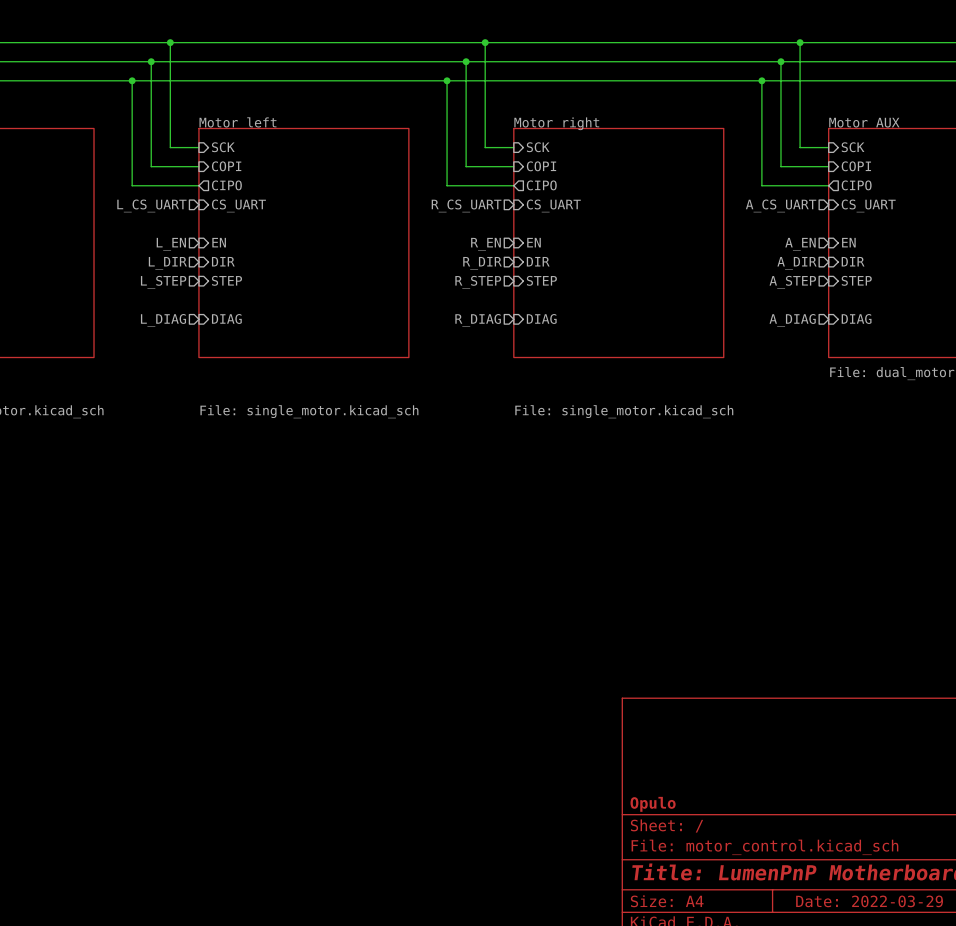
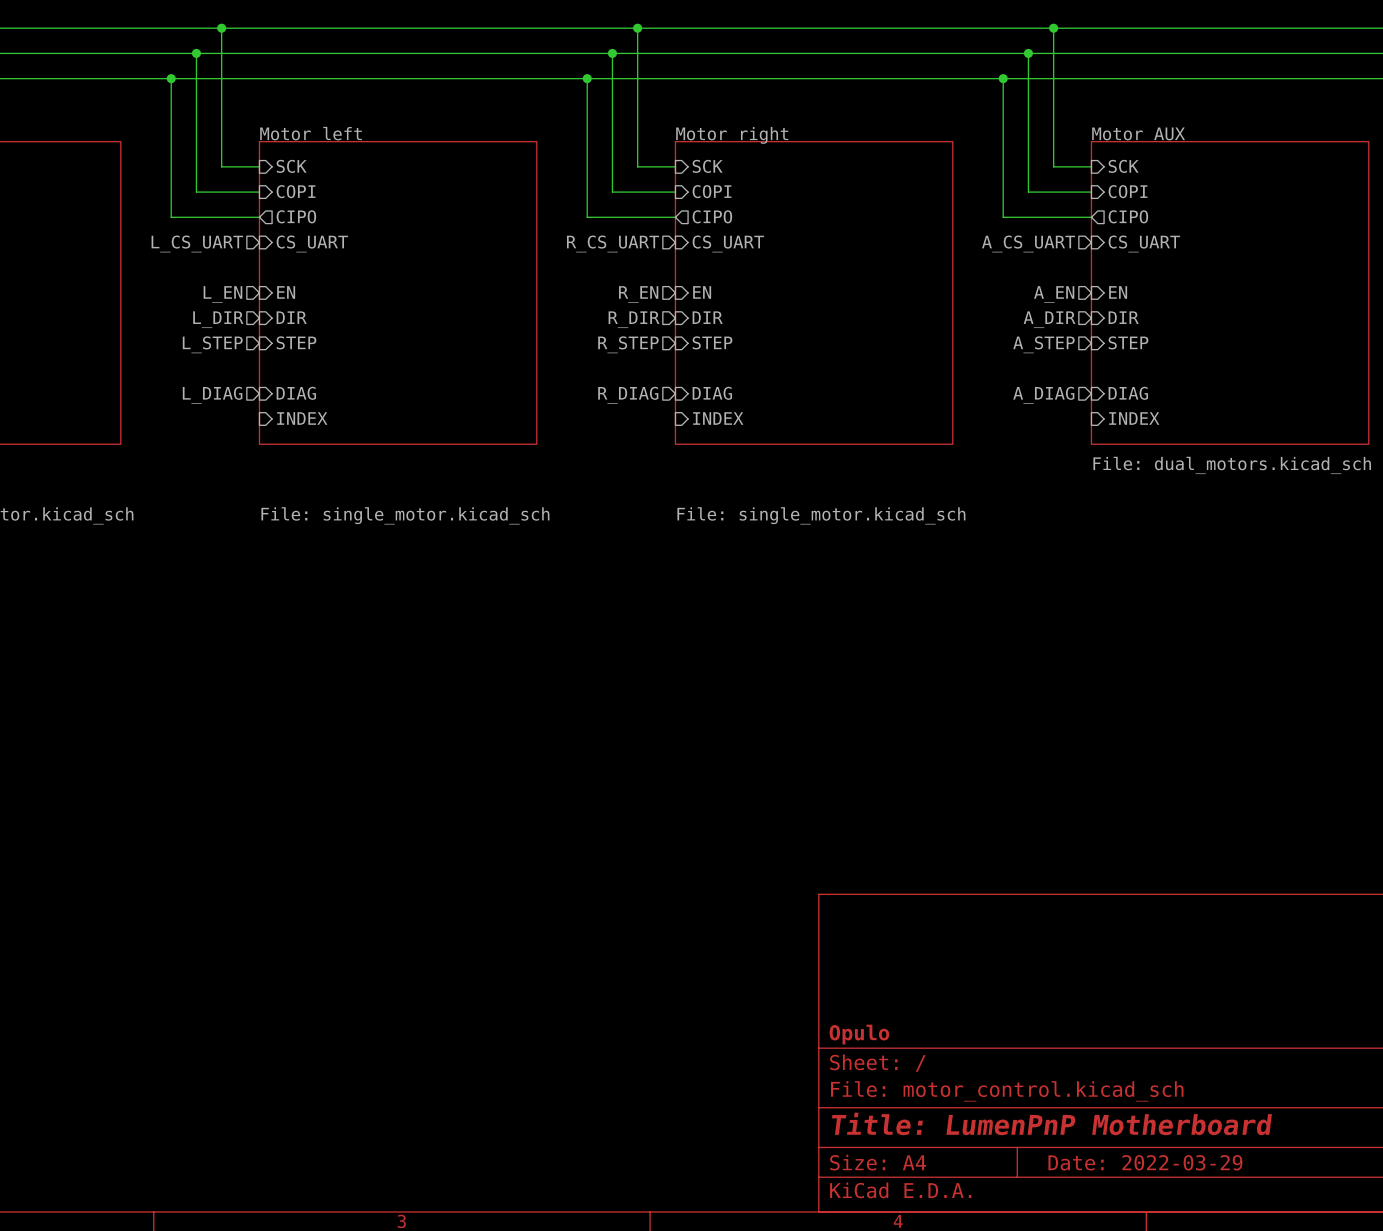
sheet pin: none -> INDEX (302, 418)
sheet pin: none -> INDEX (718, 418)
sheet pin: none -> INDEX (1134, 418)

